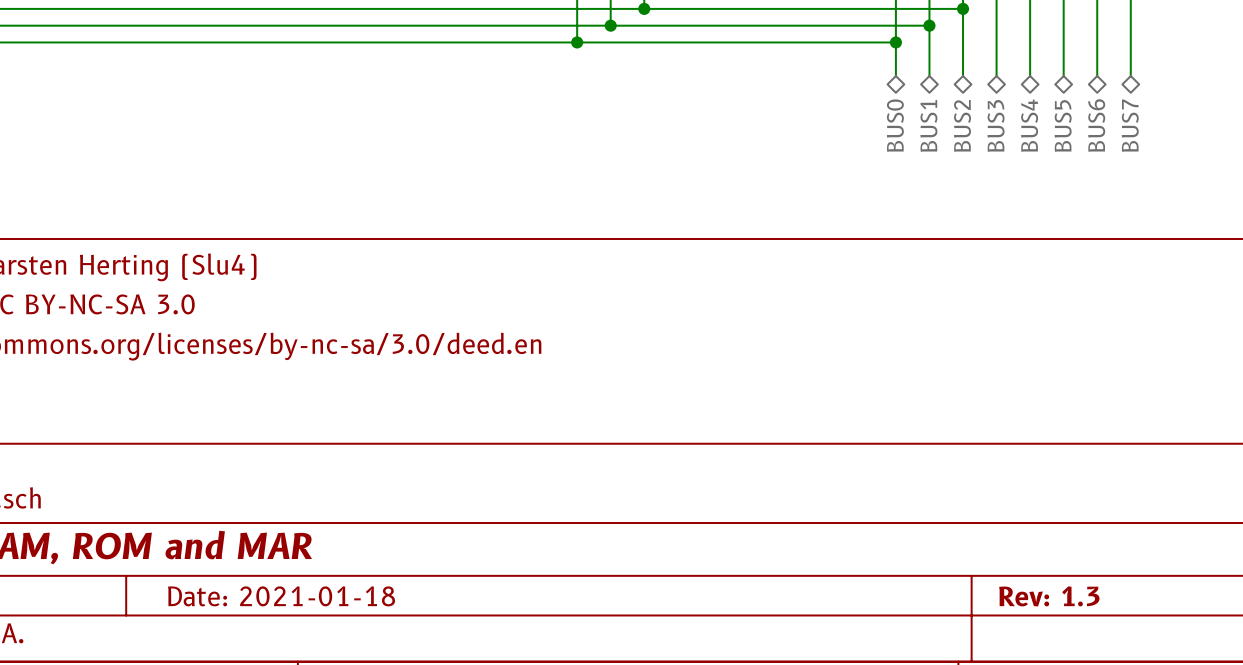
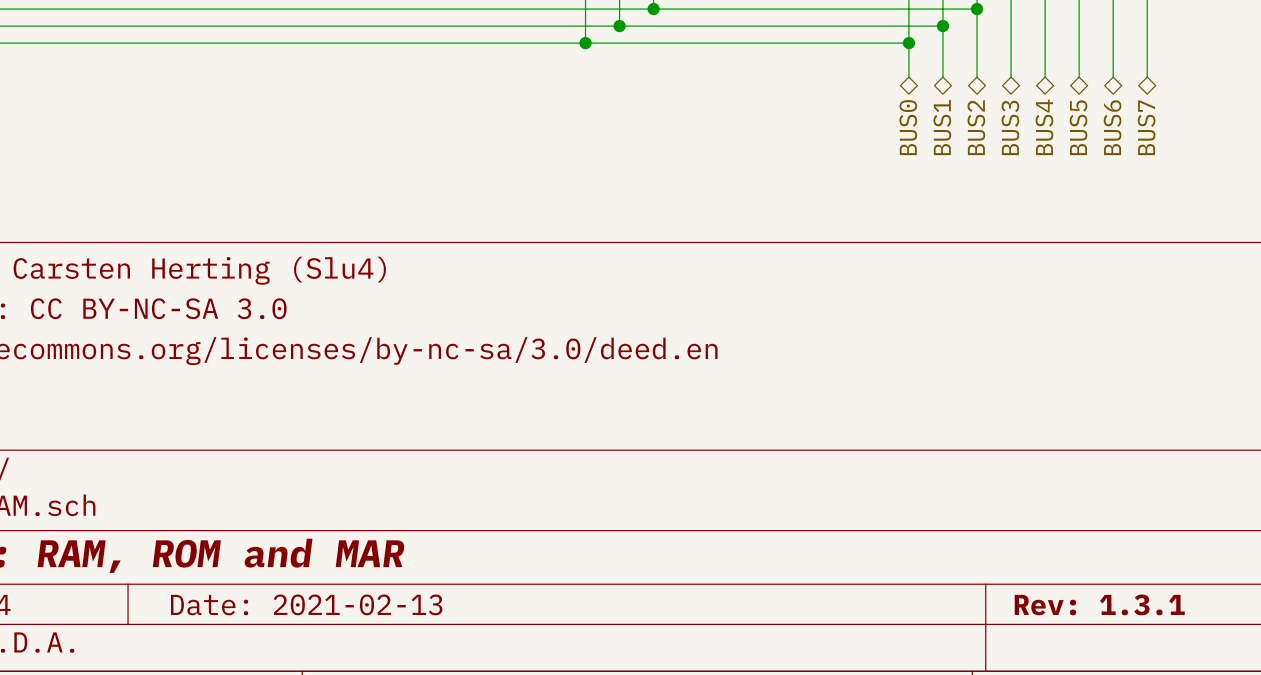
title block: Date: 2021-01-18 (281, 596) -> Date: 2021-02-13 (306, 604)
title block: Rev: 1.3 (1049, 596) -> Rev: 1.3.1 (1099, 604)

